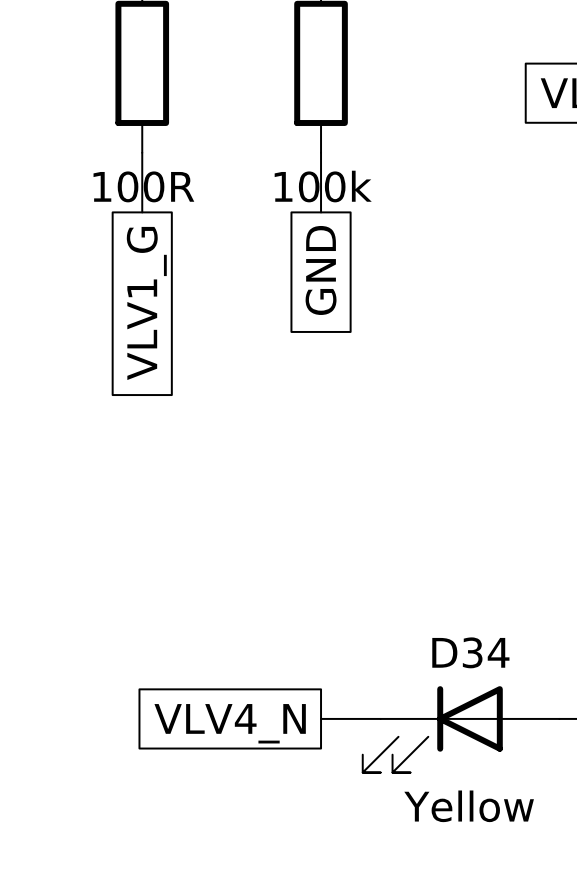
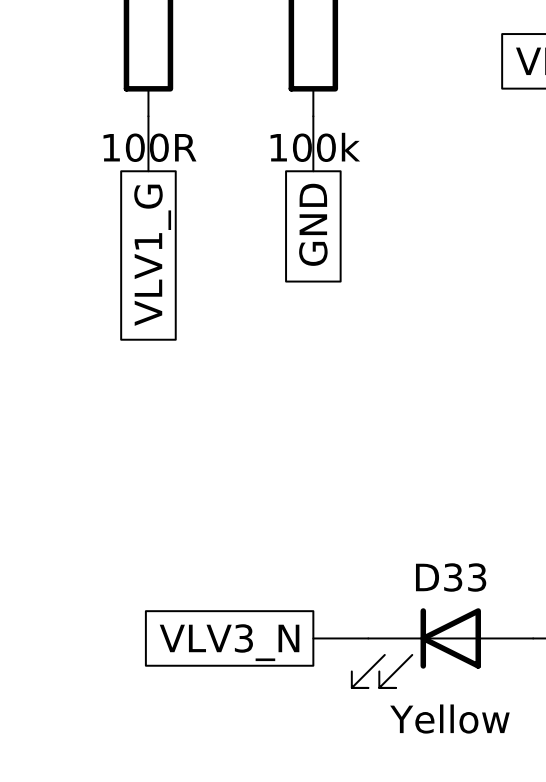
D34 name: D34 (470, 652) -> D33 (451, 577)
global label: VLV4_N (230, 723) -> VLV3_N (229, 642)

